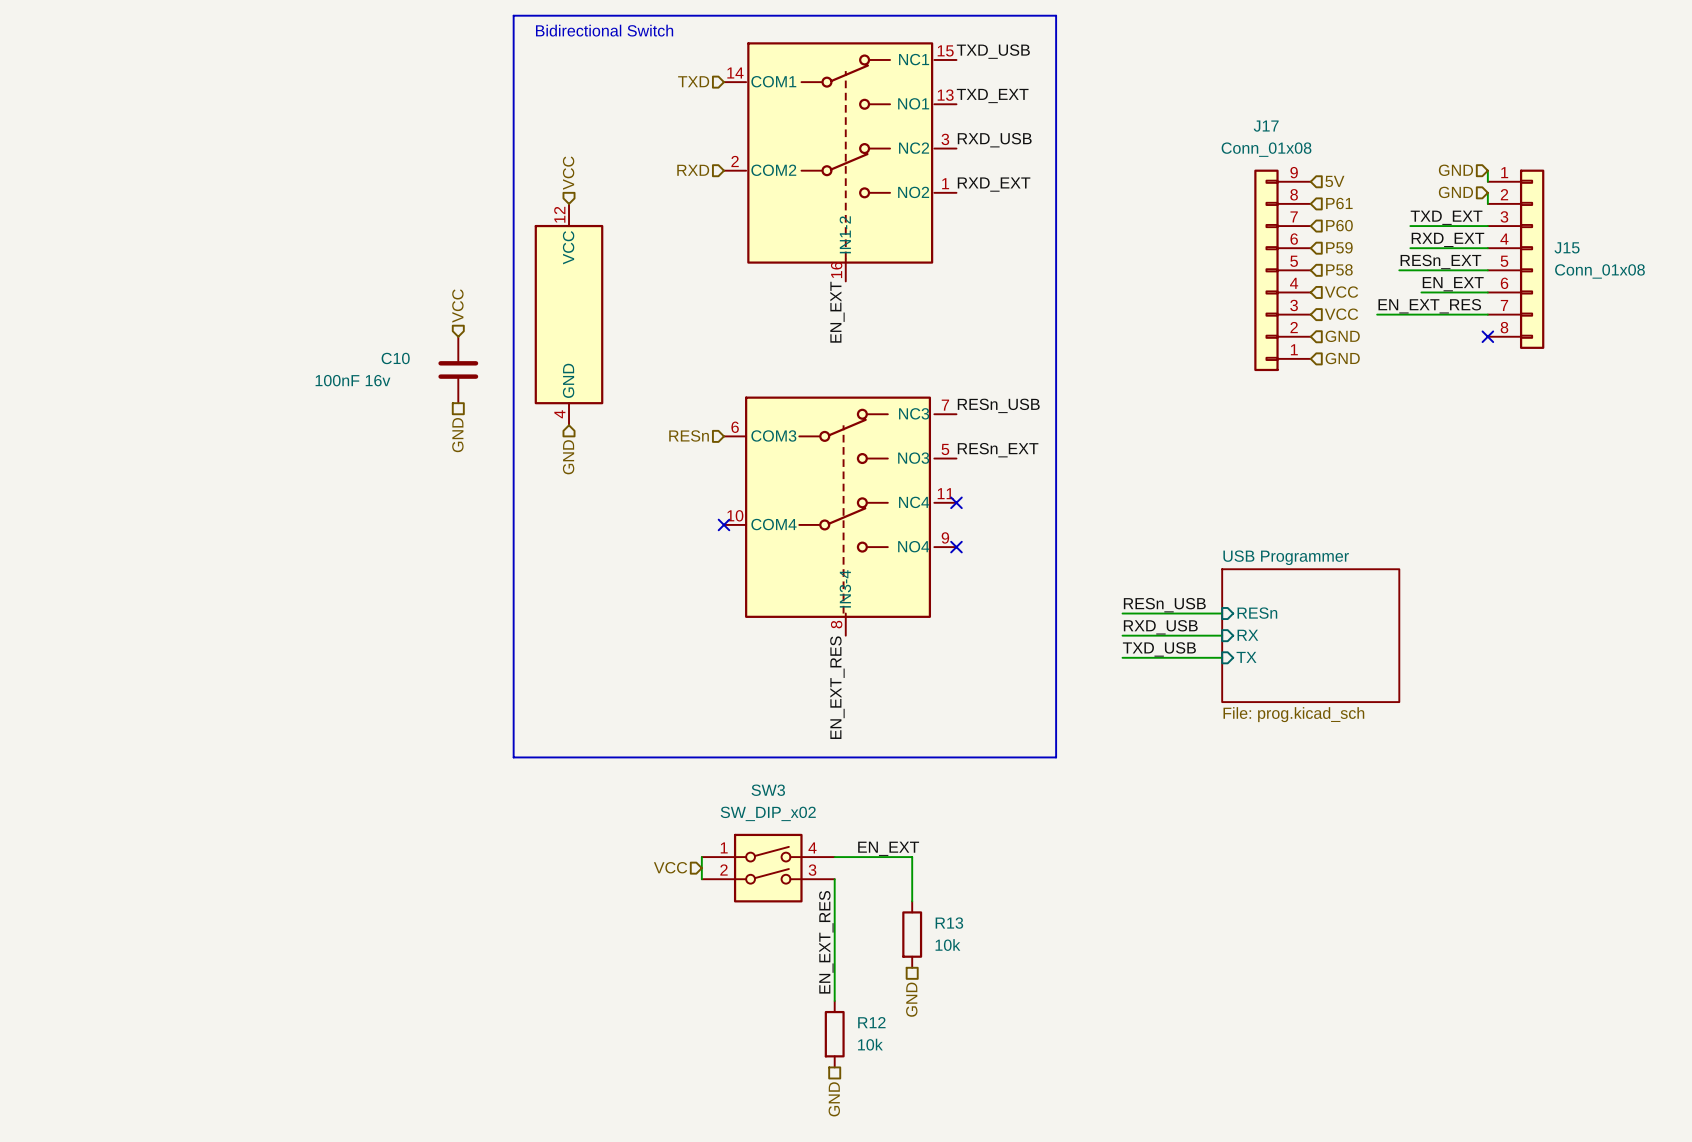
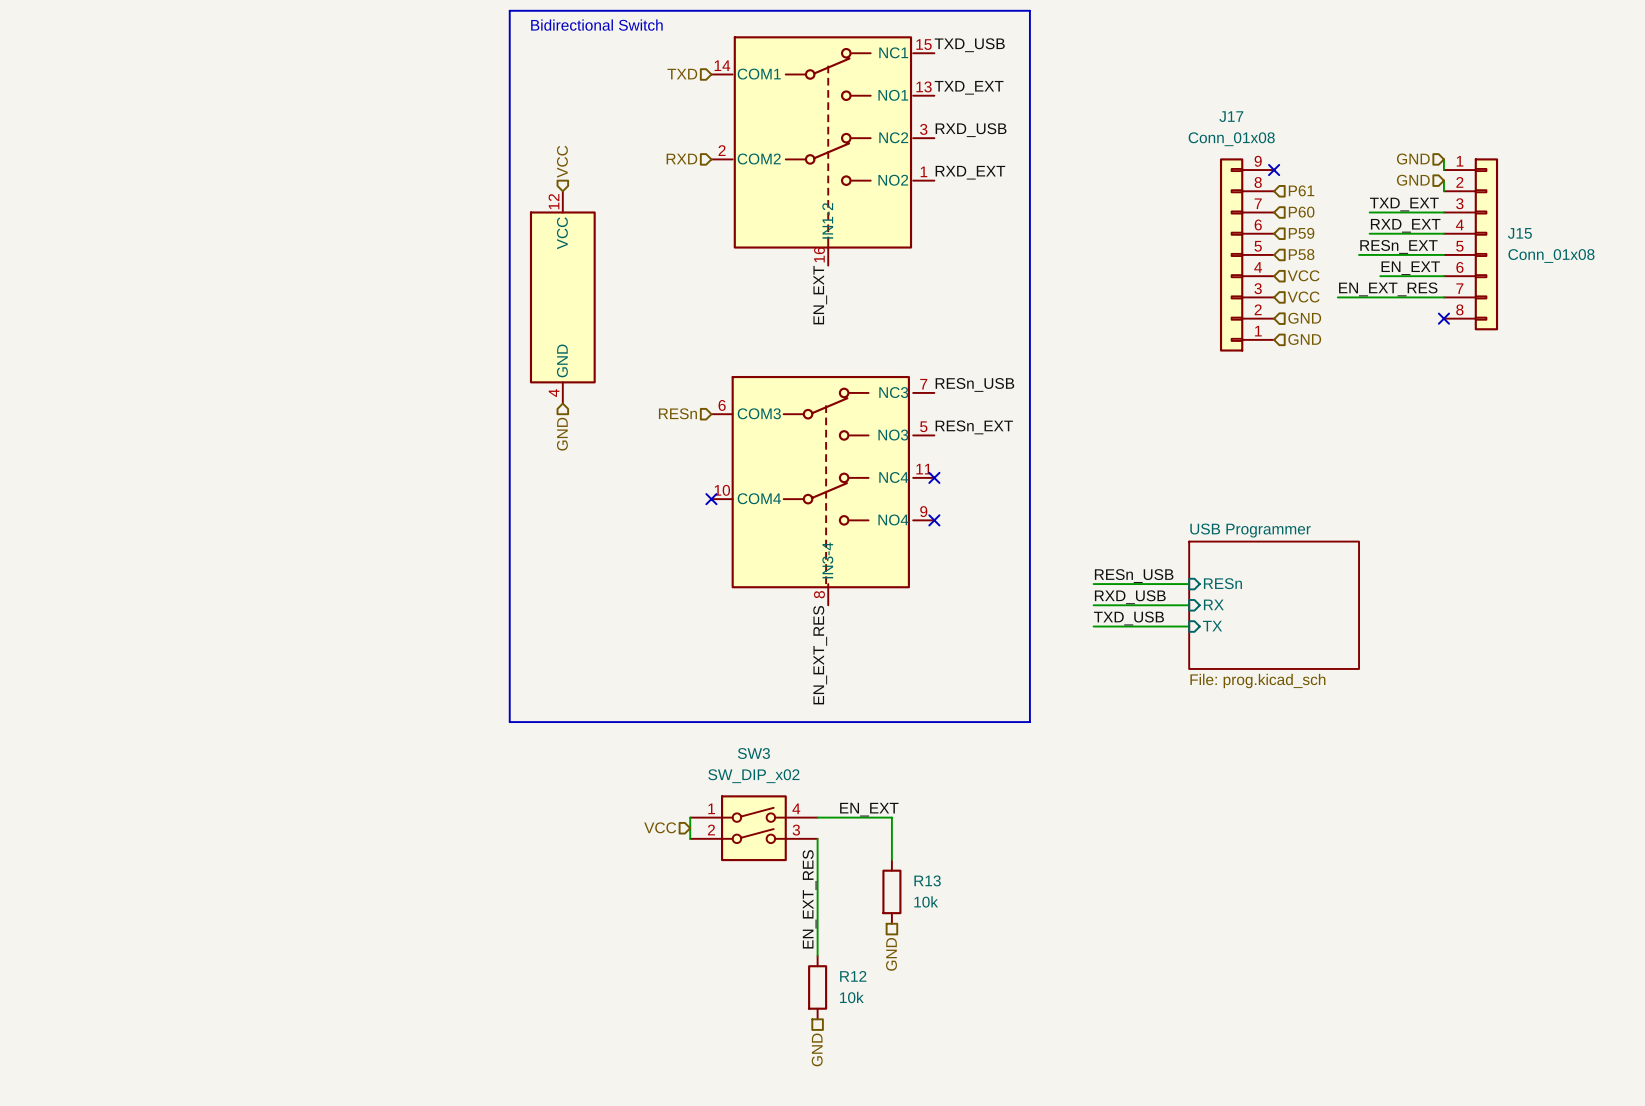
no-connect mark: none -> (1274, 170)
hierarchical label: 5V (1334, 181) -> none
hierarchical label: VCC (457, 305) -> none
C10: 100nF 16v (458, 369) -> none
hierarchical label: GND (457, 435) -> none

